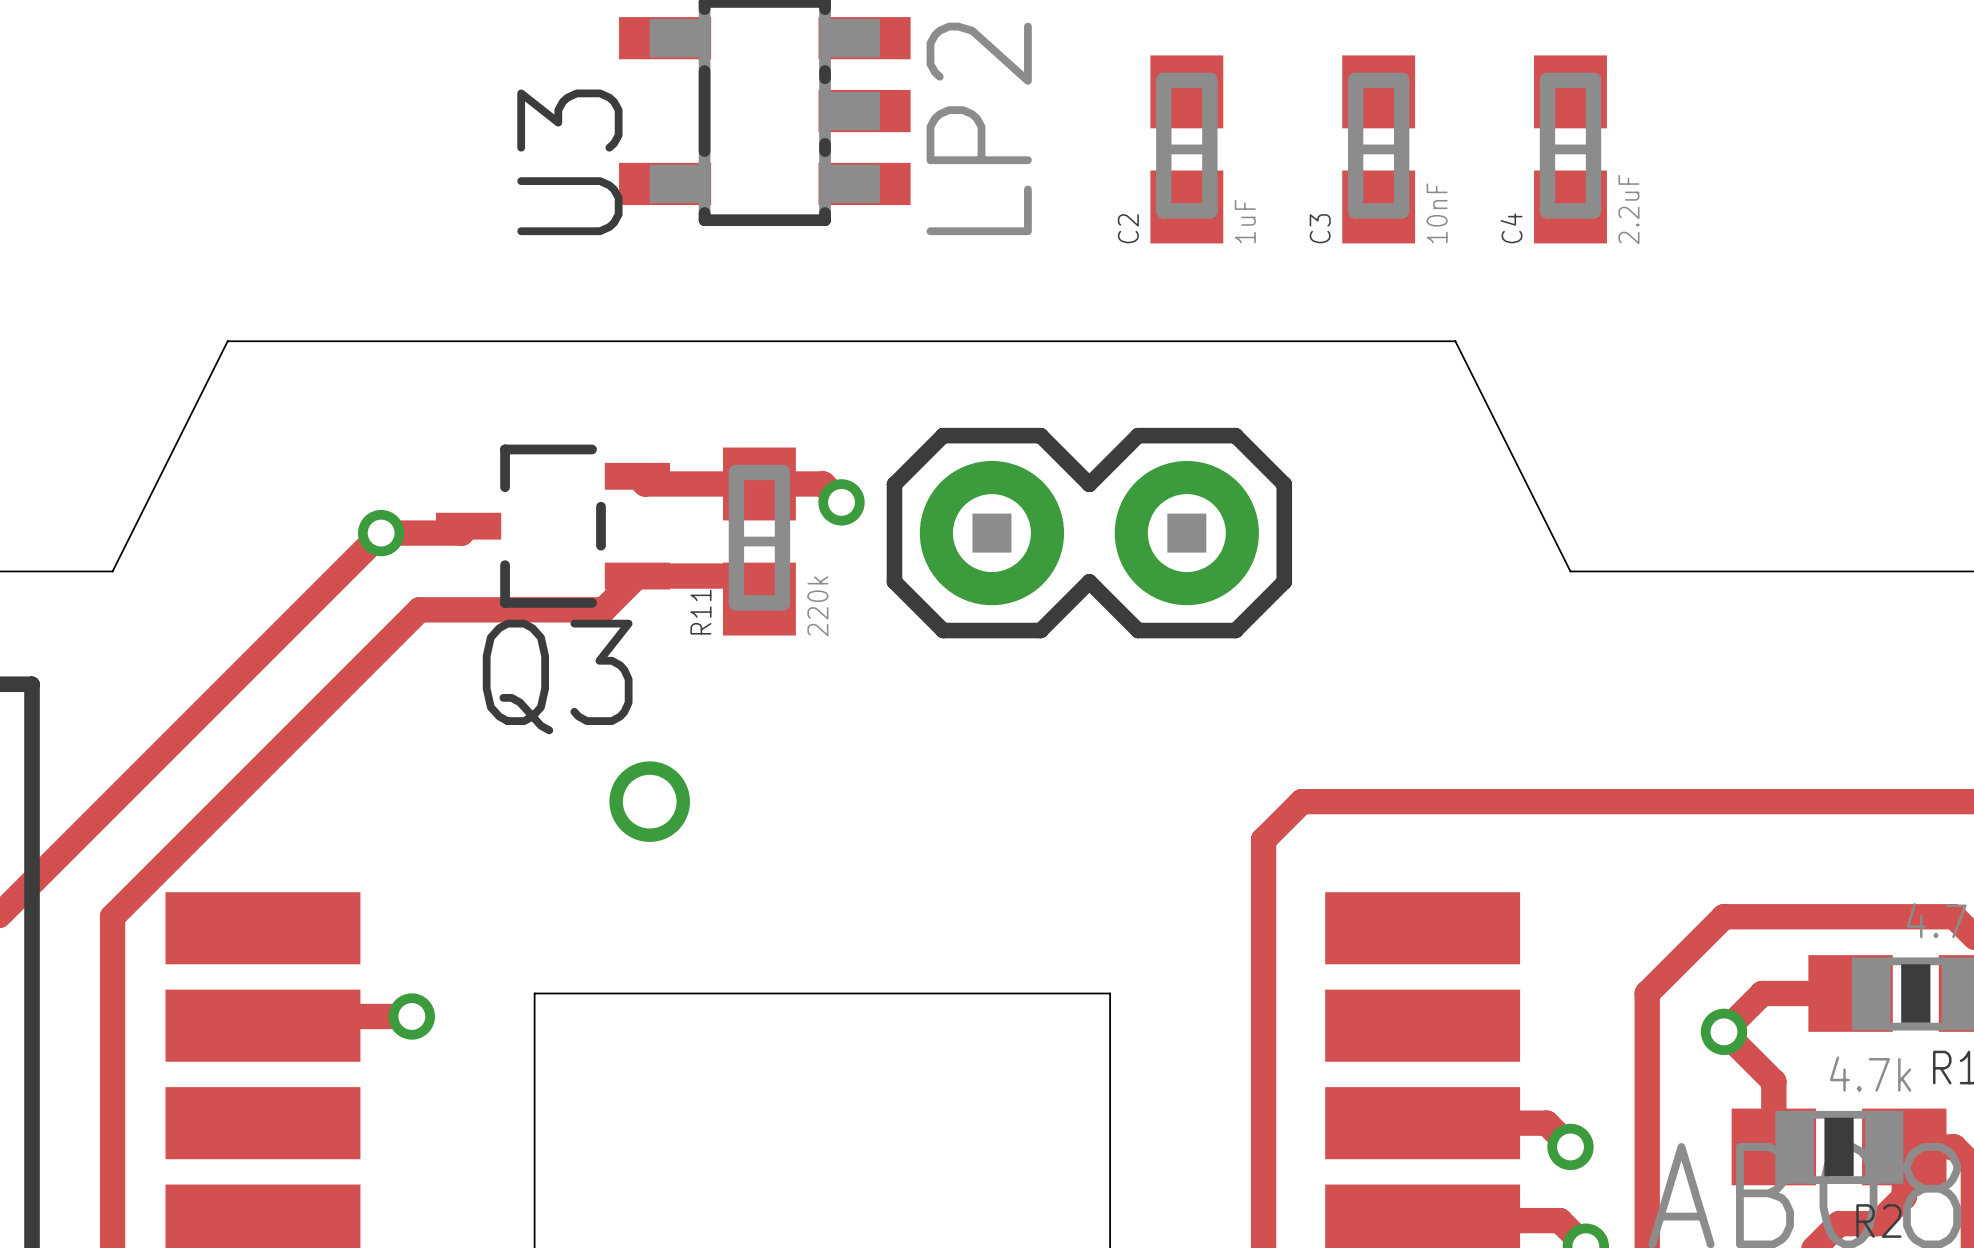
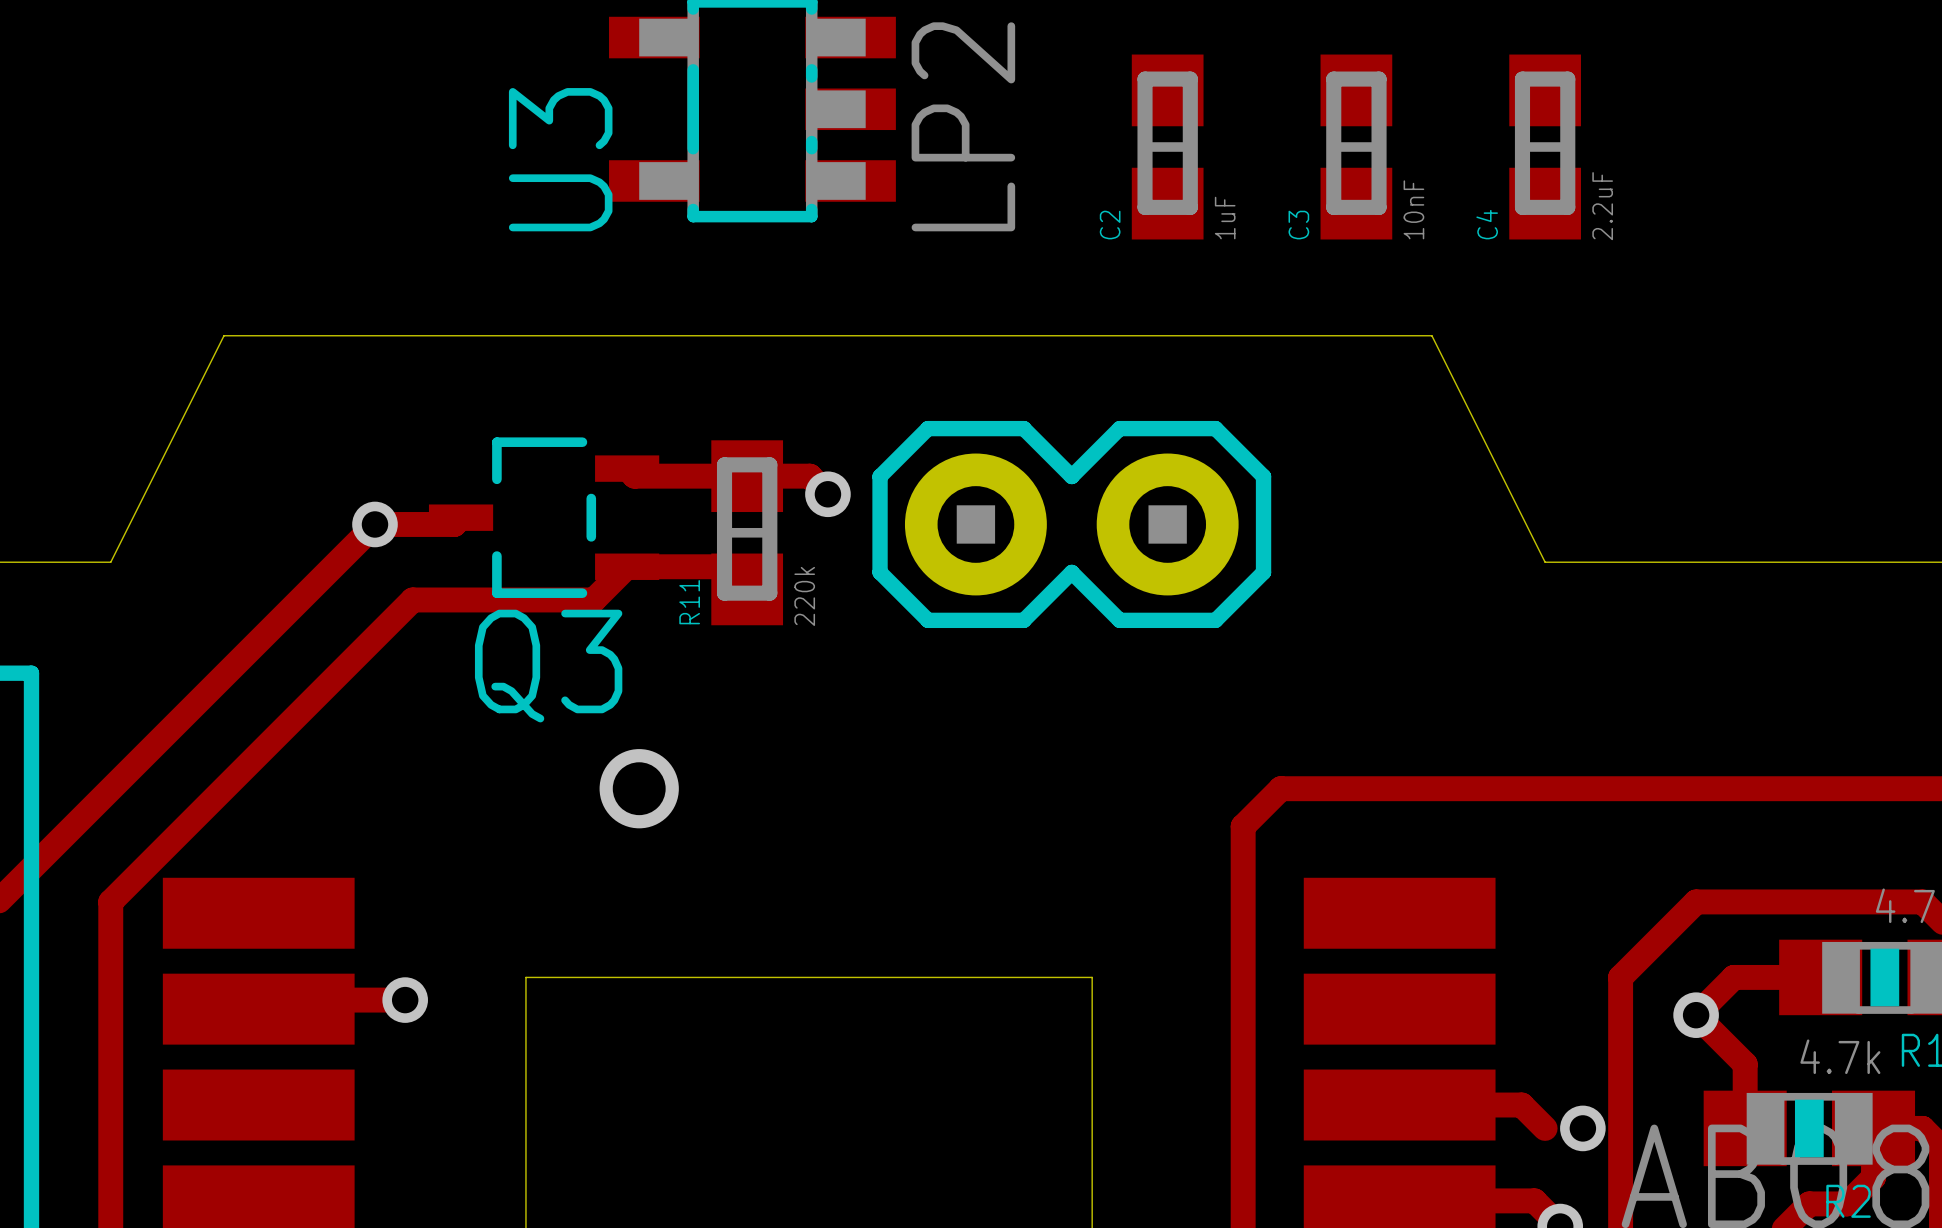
via position: (1570, 1146) -> (1582, 1128)

